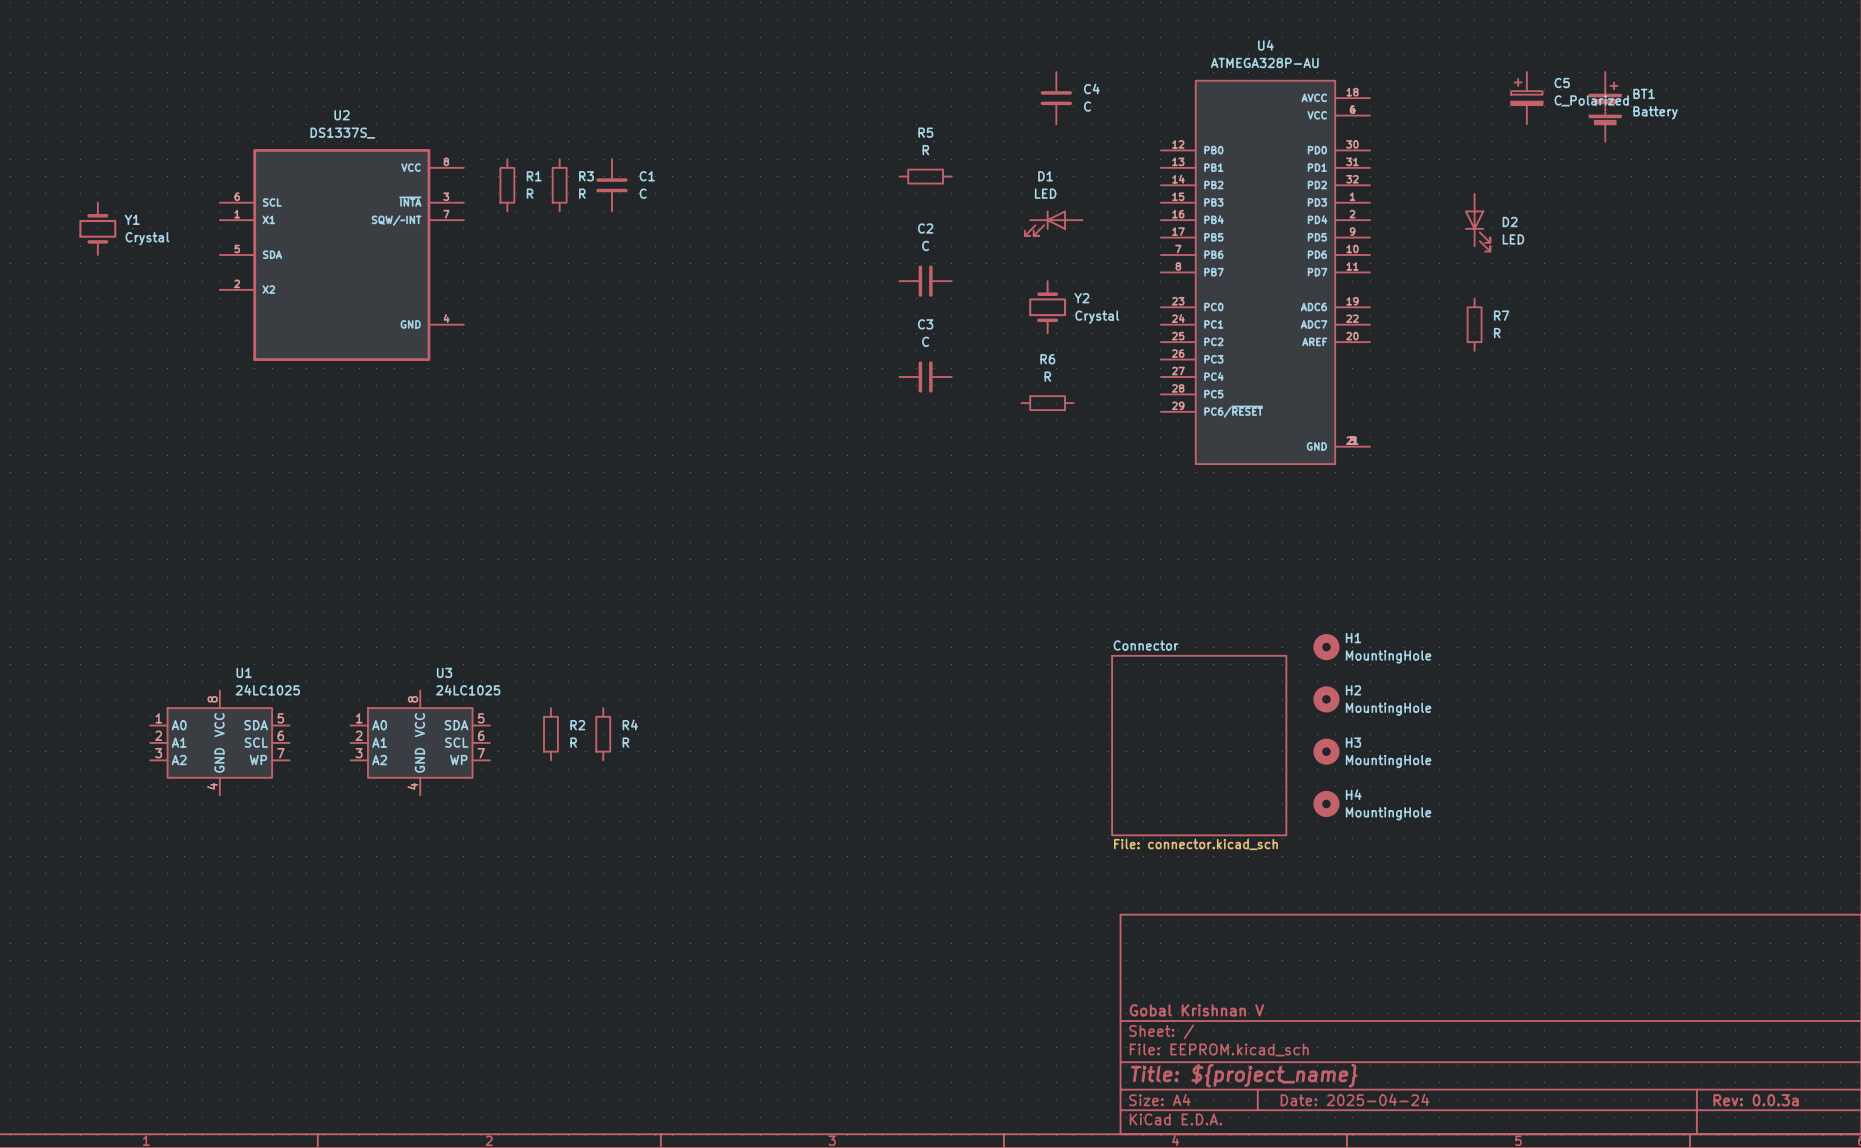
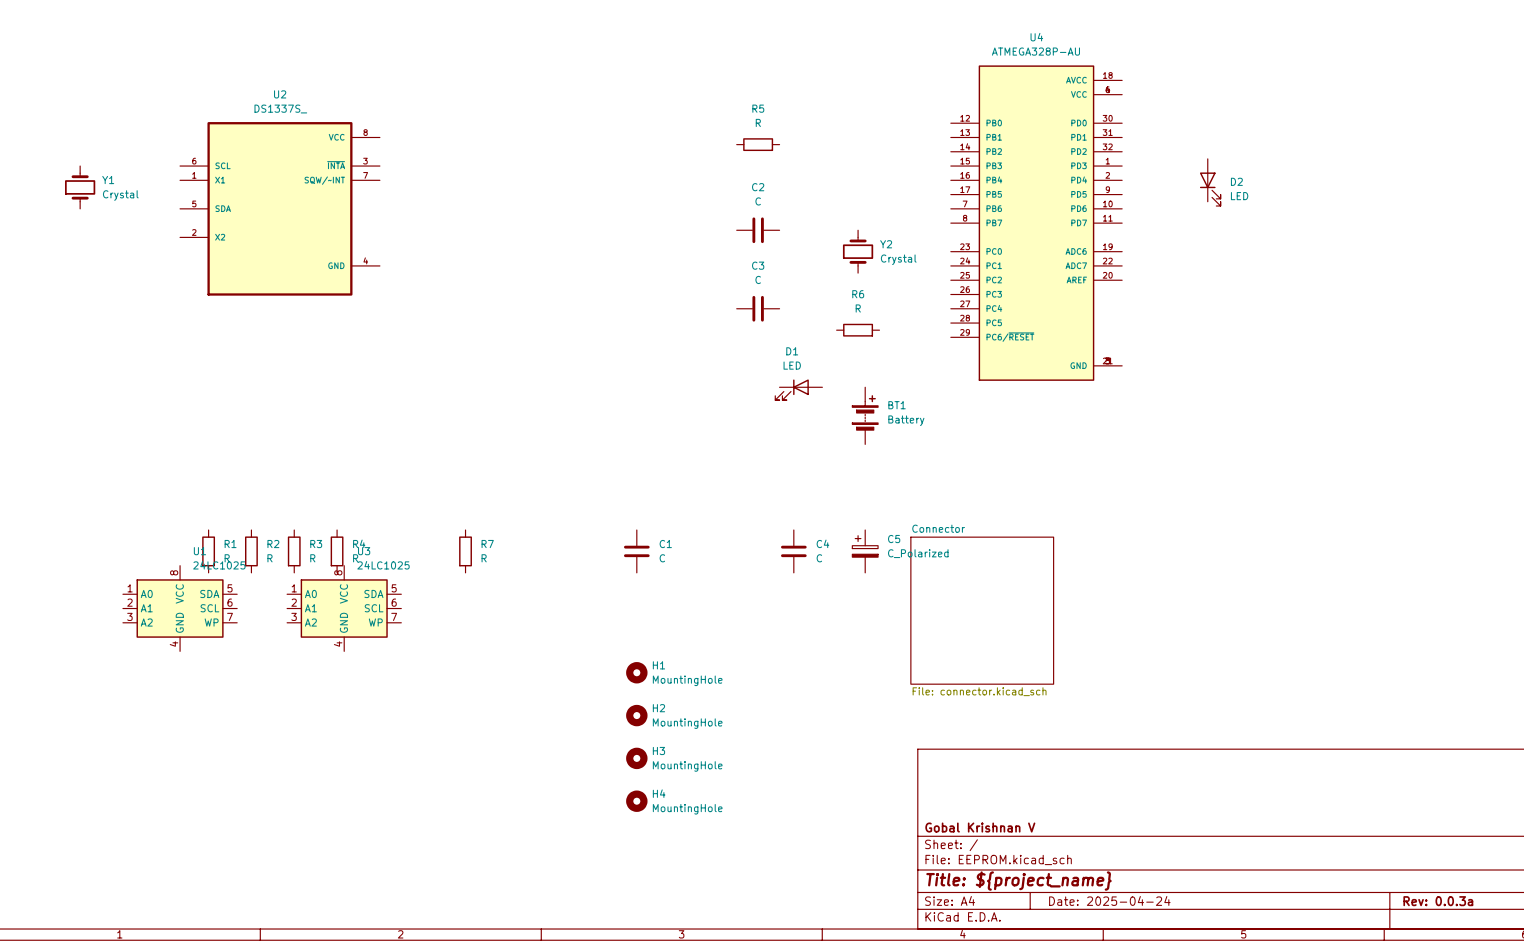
C4 position: (1056, 98) -> (793, 551)
C5 position: (1526, 98) -> (865, 551)
BT1 position: (1605, 106) -> (865, 415)
R1 position: (507, 185) -> (208, 551)
R3 position: (559, 185) -> (294, 551)
C1 position: (611, 185) -> (636, 551)
D1 position: (1053, 223) -> (798, 389)
R7 position: (1474, 324) -> (465, 551)
H1 position: (1326, 647) -> (636, 672)
H2 position: (1326, 699) -> (636, 715)
R2 position: (550, 734) -> (251, 551)
R4 position: (603, 734) -> (337, 551)
H3 position: (1326, 751) -> (636, 758)
H4 position: (1326, 803) -> (636, 801)

